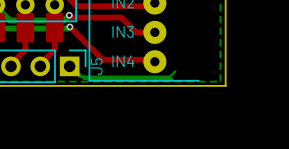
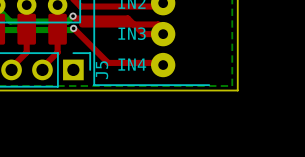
top track: none -> (82, 24) (158, 24) (167, 34)
bottom track: (69, 66) (80, 76) (170, 76) (175, 71) -> none
bottom track: (71, 66) (84, 78) (172, 78) -> none

